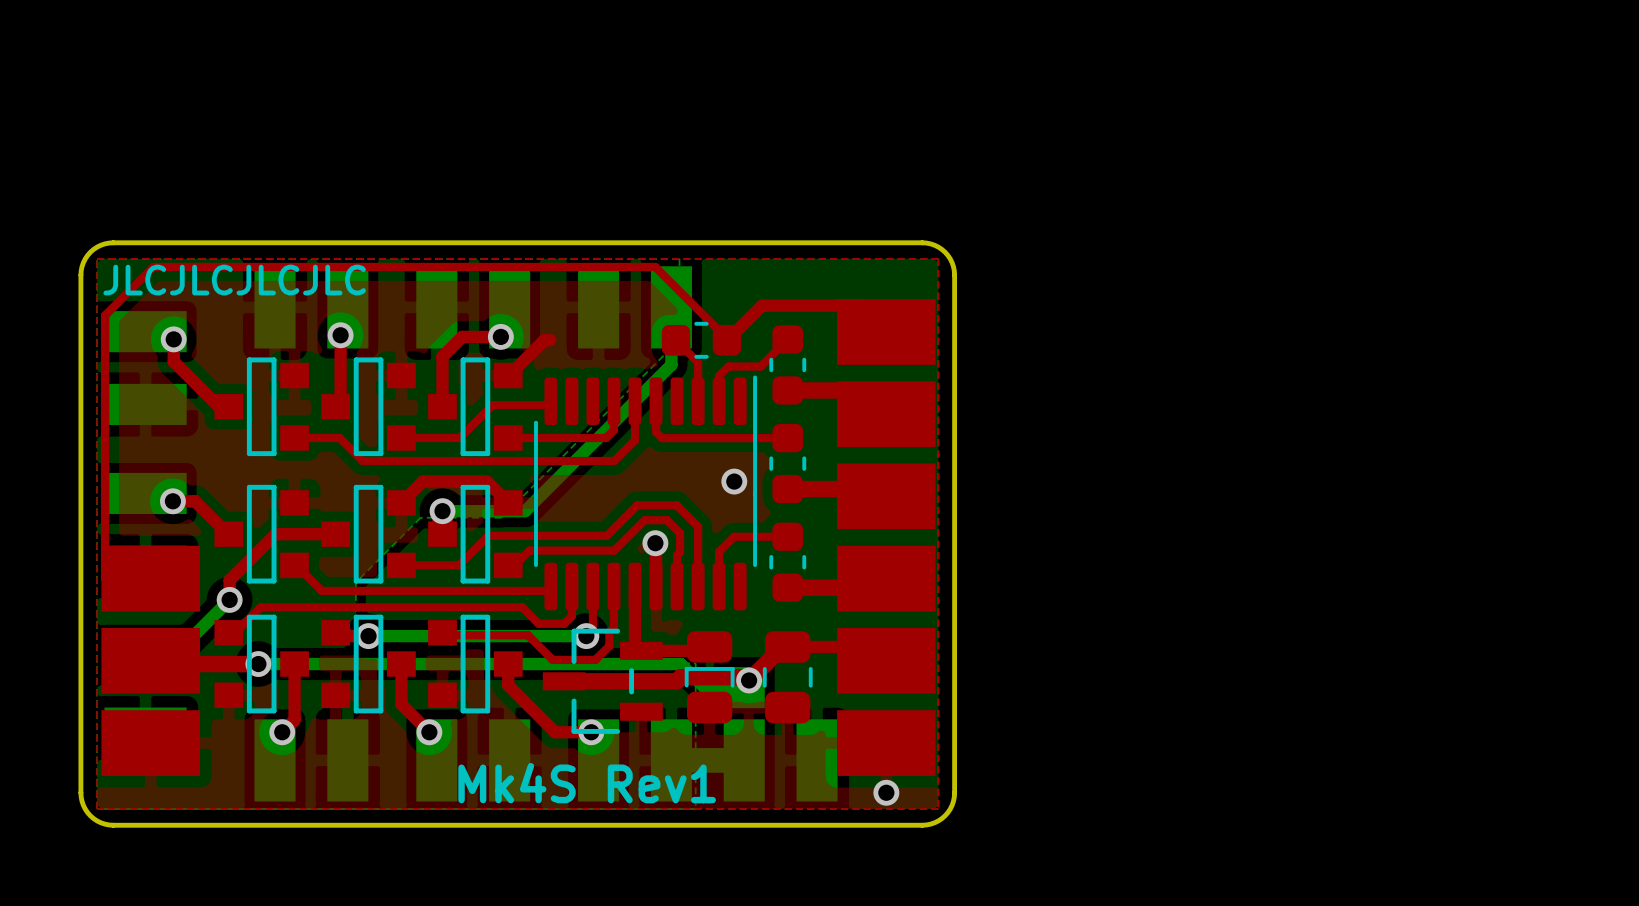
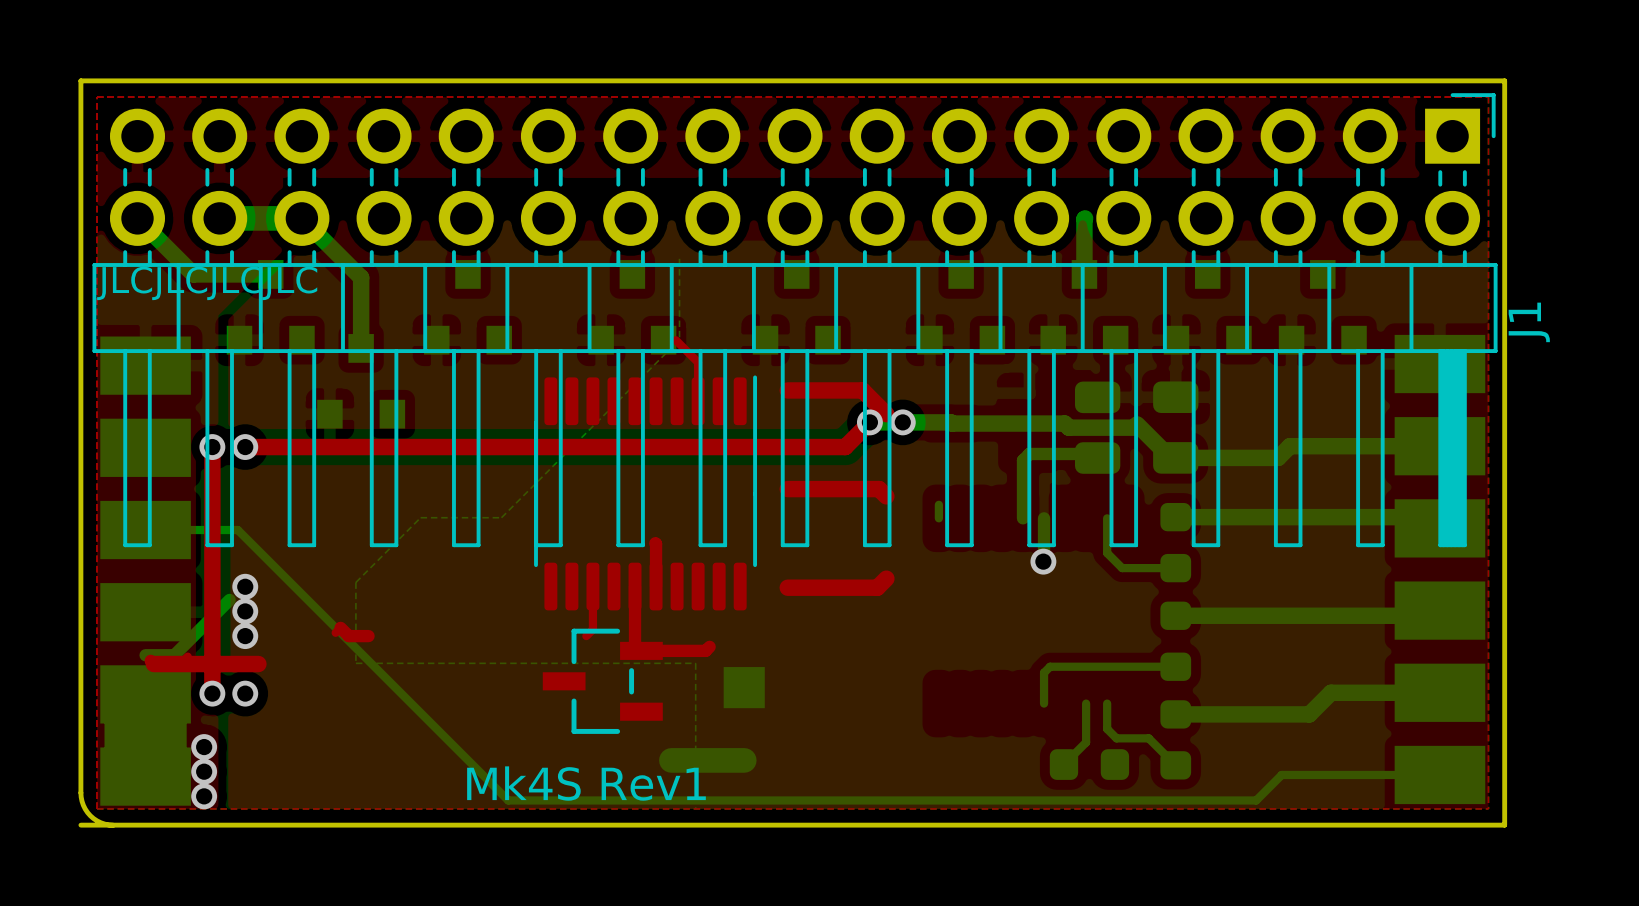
bottom track: none -> (137, 218) (193, 274) (270, 274)
bottom track: none -> (219, 218) (301, 218) (361, 277) (361, 348)
bottom track: none -> (1085, 218) (1084, 274)
top zone outline: (97, 258) (938, 258) (938, 808) -> (97, 258) (97, 97) (1488, 97) (1488, 808) (938, 808)
part footprint: [254, 266, 296, 349] -> [226, 260, 315, 355]
board edge: (80, 275) (83, 262) (90, 252) (100, 245) (113, 242) (922, 242) (938, 247) (950, 258) (954, 275) (954, 792) (952, 805) (945, 815) (934, 822) (922, 825) -> (80, 275) (80, 80) (1504, 80) (1504, 825) (922, 825)
part: (347, 307) -> none
part: (436, 307) -> none
part: (509, 307) -> none
part: (598, 307) -> none
bottom track: (671, 307) (671, 364) (525, 511) (442, 511) -> none
part: (671, 307) -> none
part: none -> (1084, 307)
part: none -> (1322, 307)
J1: none -> (795, 320)
part: (145, 331) -> none
top track: (886, 331) (860, 305) (762, 305) (727, 340) -> none
part: (886, 331) -> none
top track: (340, 335) (340, 401) (335, 406) -> none
via: (340, 335) -> none
top track: (500, 336) (462, 336) (442, 356) (442, 406) -> none
via: (500, 336) -> none
top track: (173, 339) (173, 361) (218, 406) (228, 406) -> none
via: (173, 339) -> none
top track: (787, 339) (760, 366) (728, 366) (719, 375) (719, 401) -> none
top track: (550, 340) (544, 340) (508, 375) -> none
part side: top (701, 340) -> bottom (1089, 764)
top track: (726, 340) (655, 266) (153, 266) (105, 315) (105, 578) (150, 578) -> none
part side: top (787, 364) -> bottom (1175, 739)
top track: (550, 401) (547, 405) (492, 405) (459, 438) (401, 438) -> none
top track: (613, 401) (613, 430) (606, 438) (508, 438) -> none
top track: (635, 401) (635, 440) (614, 461) (362, 461) (339, 438) (294, 438) -> none
top track: (656, 401) (656, 432) (662, 438) (787, 438) -> none
part: (145, 404) -> none
part side: top (261, 406) -> bottom (961, 307)
part side: top (368, 406) -> bottom (361, 381)
part side: top (475, 406) -> bottom (1207, 307)
part: (886, 414) -> none
top track: none -> (869, 422) (845, 447) (245, 447)
bottom track: none -> (869, 422) (1064, 423) (1068, 427) (1133, 427) (1137, 424) (1170, 457) (1278, 457) (1289, 446) (1439, 446)
via: none -> (869, 422)
via: none -> (902, 422)
top track: none -> (212, 447) (212, 693)
via: none -> (212, 447)
via: none -> (245, 447)
bottom track: none -> (1097, 458) (1093, 453) (1029, 453) (1023, 460) (1023, 518)
part side: top (787, 463) -> bottom (1175, 641)
via: (734, 481) -> none
part: (145, 493) -> none
part: (886, 496) -> none
top track: (172, 501) (195, 501) (228, 534) -> none
via: (172, 501) -> none
top track: (401, 502) (422, 481) (486, 481) (508, 502) -> none
bottom track: none -> (938, 504) (938, 518)
via: (442, 511) -> none
bottom track: none -> (1175, 517) (1428, 517) (1439, 528)
bottom track: none -> (1044, 518) (1043, 561)
bottom track: none -> (1107, 518) (1107, 553) (1122, 568) (1175, 568)
bottom track: none -> (145, 530) (237, 530) (508, 800) (1256, 800) (1281, 774) (1439, 774)
part side: top (261, 534) -> bottom (796, 307)
top track: (335, 534) (275, 534) (229, 580) (229, 599) -> none
part side: top (368, 534) -> bottom (632, 307)
part: (475, 534) -> none
top track: (787, 536) (734, 536) (719, 551) (719, 586) -> none
via: (655, 543) -> none
via: none -> (1043, 561)
part side: top (787, 562) -> bottom (1175, 542)
top track: (294, 565) (321, 590) (546, 590) (550, 586) (550, 600) -> none
top track: (401, 565) (458, 565) (488, 535) (606, 535) (637, 505) (676, 505) (698, 526) (698, 586) -> none
top track: (514, 565) (529, 550) (614, 550) (644, 520) (666, 520) (680, 533) (680, 552) (677, 555) (677, 586) -> none
part: none -> (1439, 569)
part: none -> (145, 571)
part: (150, 578) -> none
part: (886, 578) -> none
via: none -> (245, 586)
top track: (571, 586) (571, 616) (564, 623) (538, 623) (522, 607) (260, 607) (235, 632) (228, 632) -> none
top track: (613, 586) (613, 627) (609, 631) (609, 645) (595, 659) (552, 659) (528, 635) (445, 636) (442, 632) -> none
via: (229, 599) -> none
bottom track: none -> (1439, 610) (1434, 615) (1175, 615)
via: none -> (245, 611)
via: none -> (245, 636)
bottom track: (368, 636) (586, 636) -> none
via: (368, 636) -> none
via: (586, 636) -> none
part: (150, 660) -> none
top track: (886, 660) (872, 646) (782, 646) (749, 680) (745, 677) (680, 677) (676, 681) (564, 681) -> none
part: (886, 660) -> none
bottom track: (258, 664) (680, 664) (703, 687) (744, 687) -> none
via: (258, 664) -> none
part side: top (261, 664) -> bottom (467, 307)
top track: (294, 664) (294, 719) (282, 732) -> none
part: (368, 664) -> none
top track: (401, 664) (401, 704) (429, 732) -> none
part: (475, 664) -> none
top track: (508, 664) (508, 685) (555, 732) (591, 732) -> none
bottom track: none -> (1175, 666) (1050, 666) (1044, 672) (1044, 703)
part side: top (709, 677) -> bottom (1097, 427)
part side: top (787, 677) -> bottom (1175, 427)
via: (749, 680) -> none
bottom track: none -> (1439, 692) (1331, 692) (1309, 714) (1175, 714)
via: none -> (212, 693)
via: none -> (245, 693)
bottom track: none -> (1086, 703) (1086, 742) (1063, 764)
bottom track: none -> (1107, 703) (1107, 728) (1116, 738) (1148, 738) (1175, 765)
via: (282, 732) -> none
via: (429, 732) -> none
via: (591, 732) -> none
part: (150, 743) -> none
part: (886, 743) -> none
via: none -> (204, 747)
part: (275, 760) -> none
part: (347, 760) -> none
part: (436, 760) -> none
part: (509, 760) -> none
part: (598, 760) -> none
part: (671, 760) -> none
part: (744, 760) -> none
part: (817, 760) -> none
via: none -> (204, 771)
via: (886, 792) -> none
via: none -> (204, 796)

